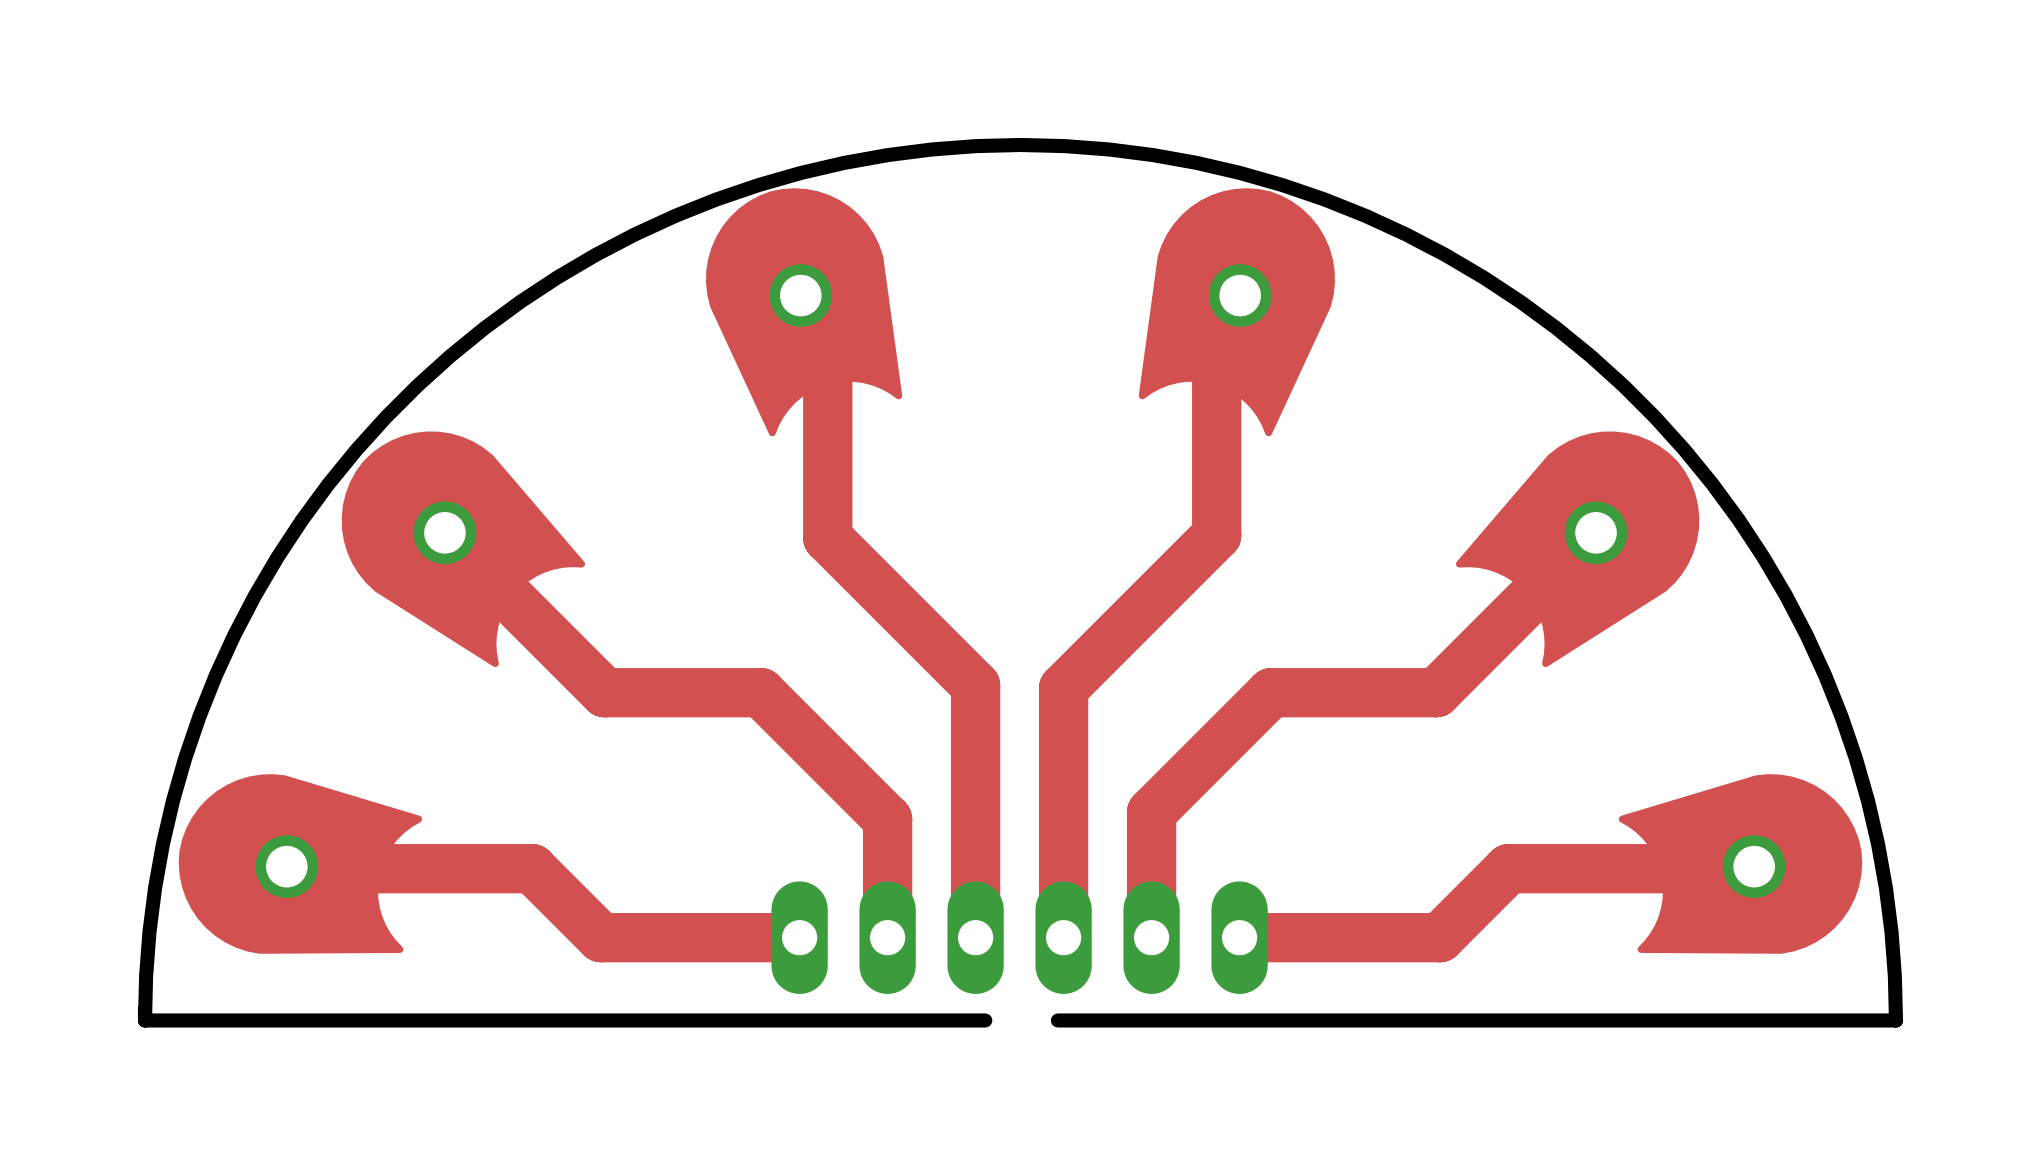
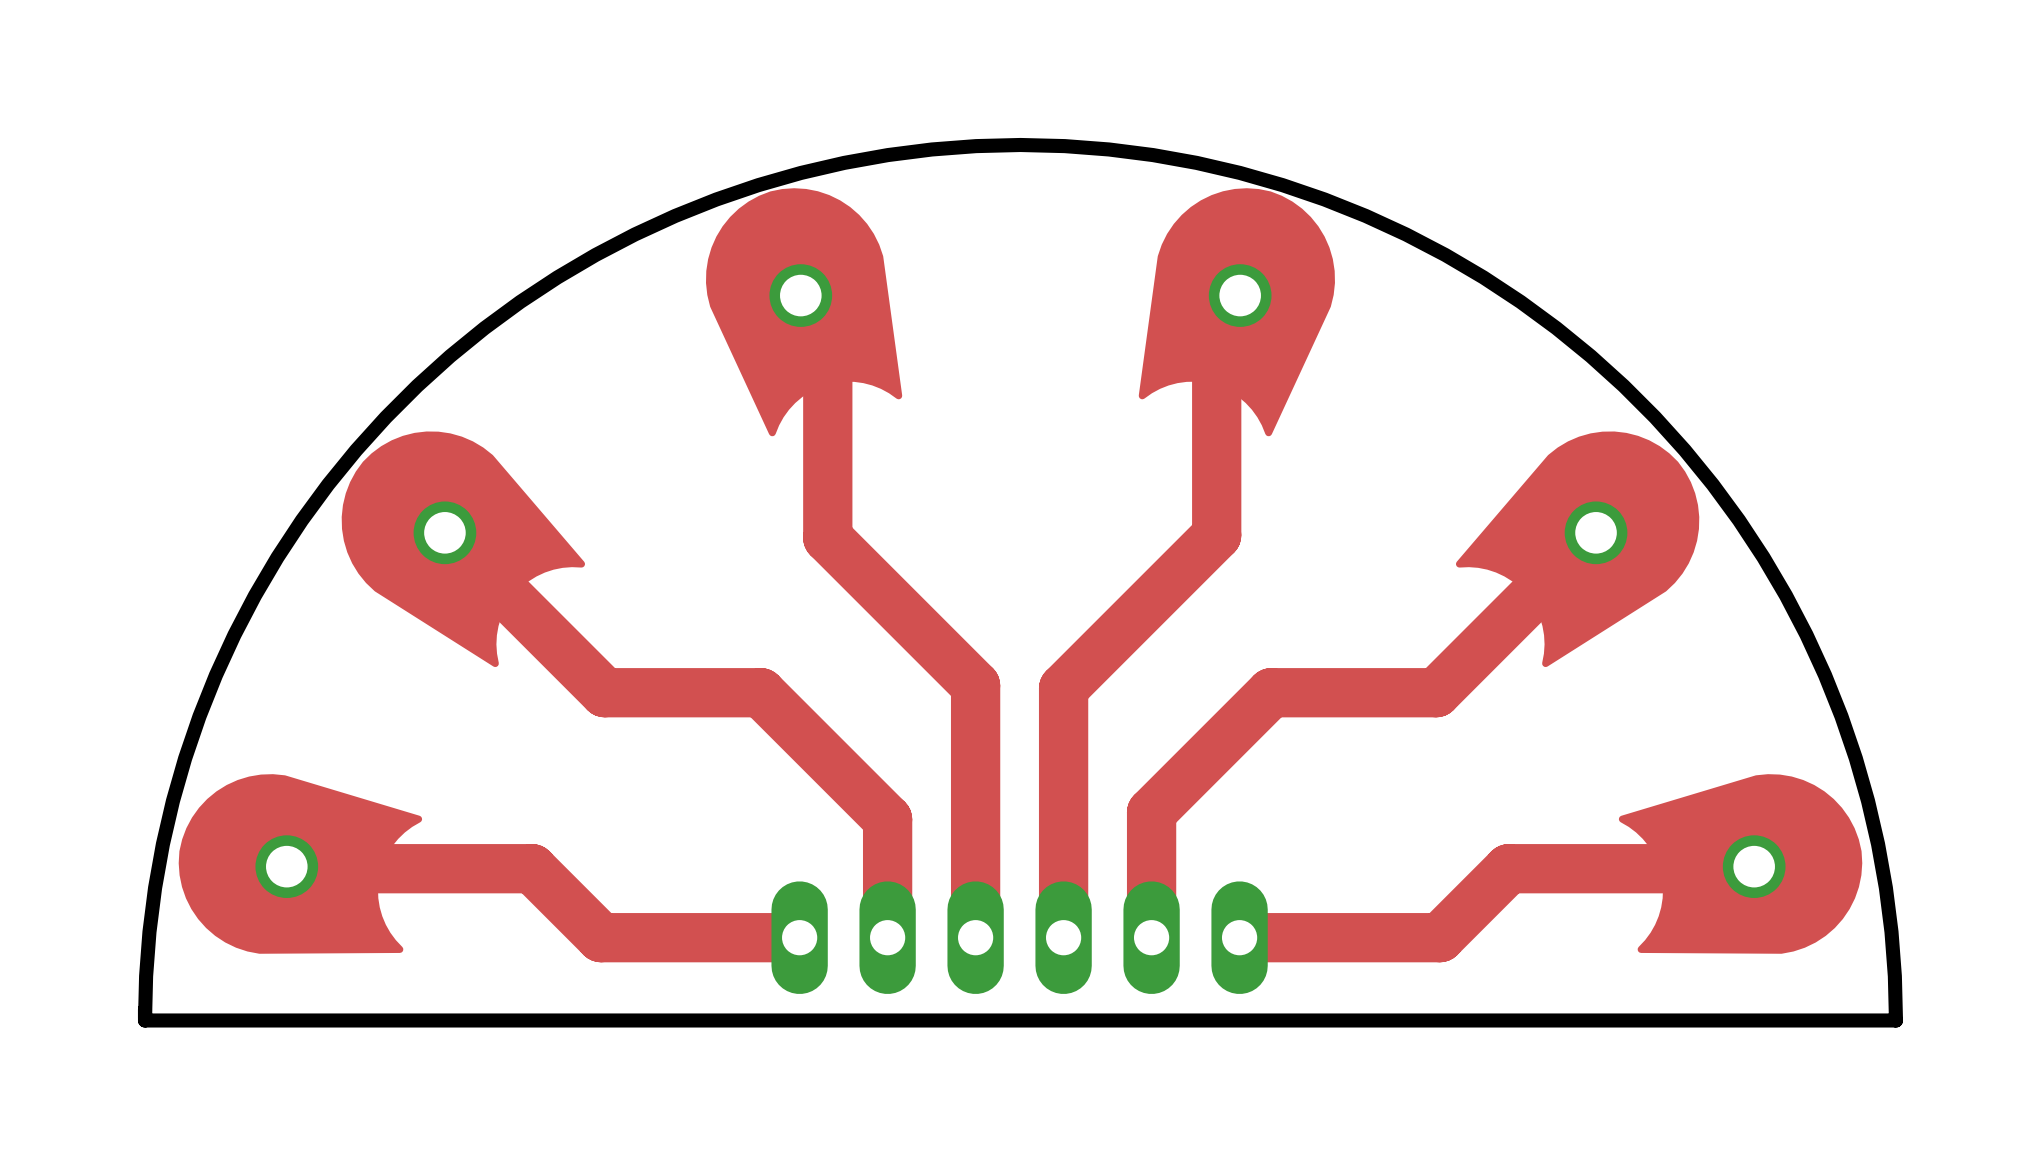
board edge: none -> (985, 1020) (1057, 1020)

